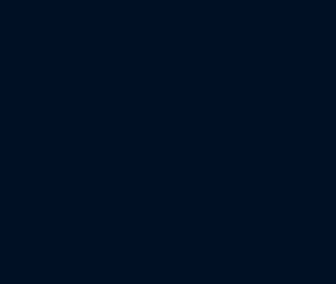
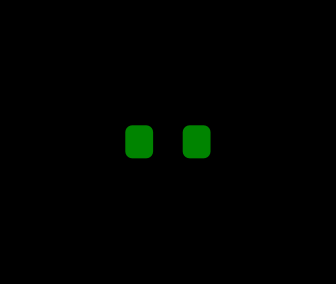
part: none -> (167, 141)

